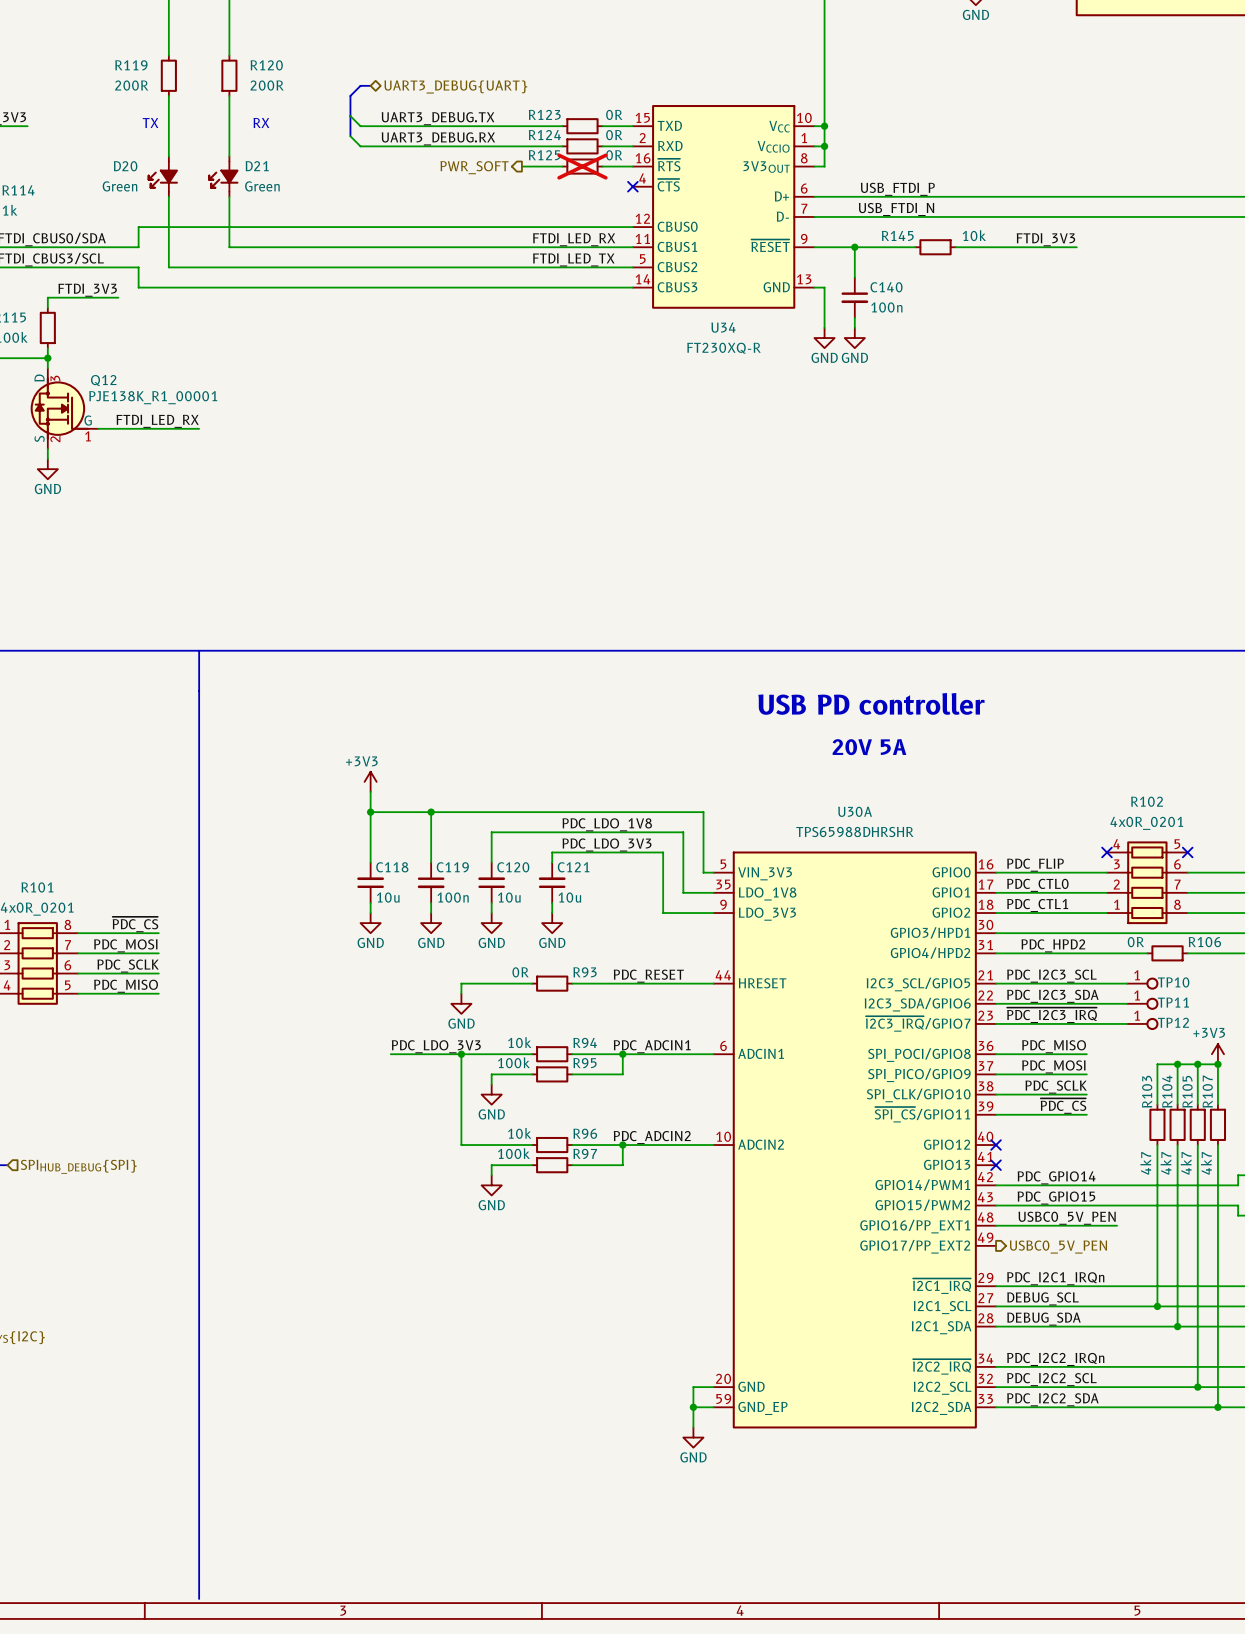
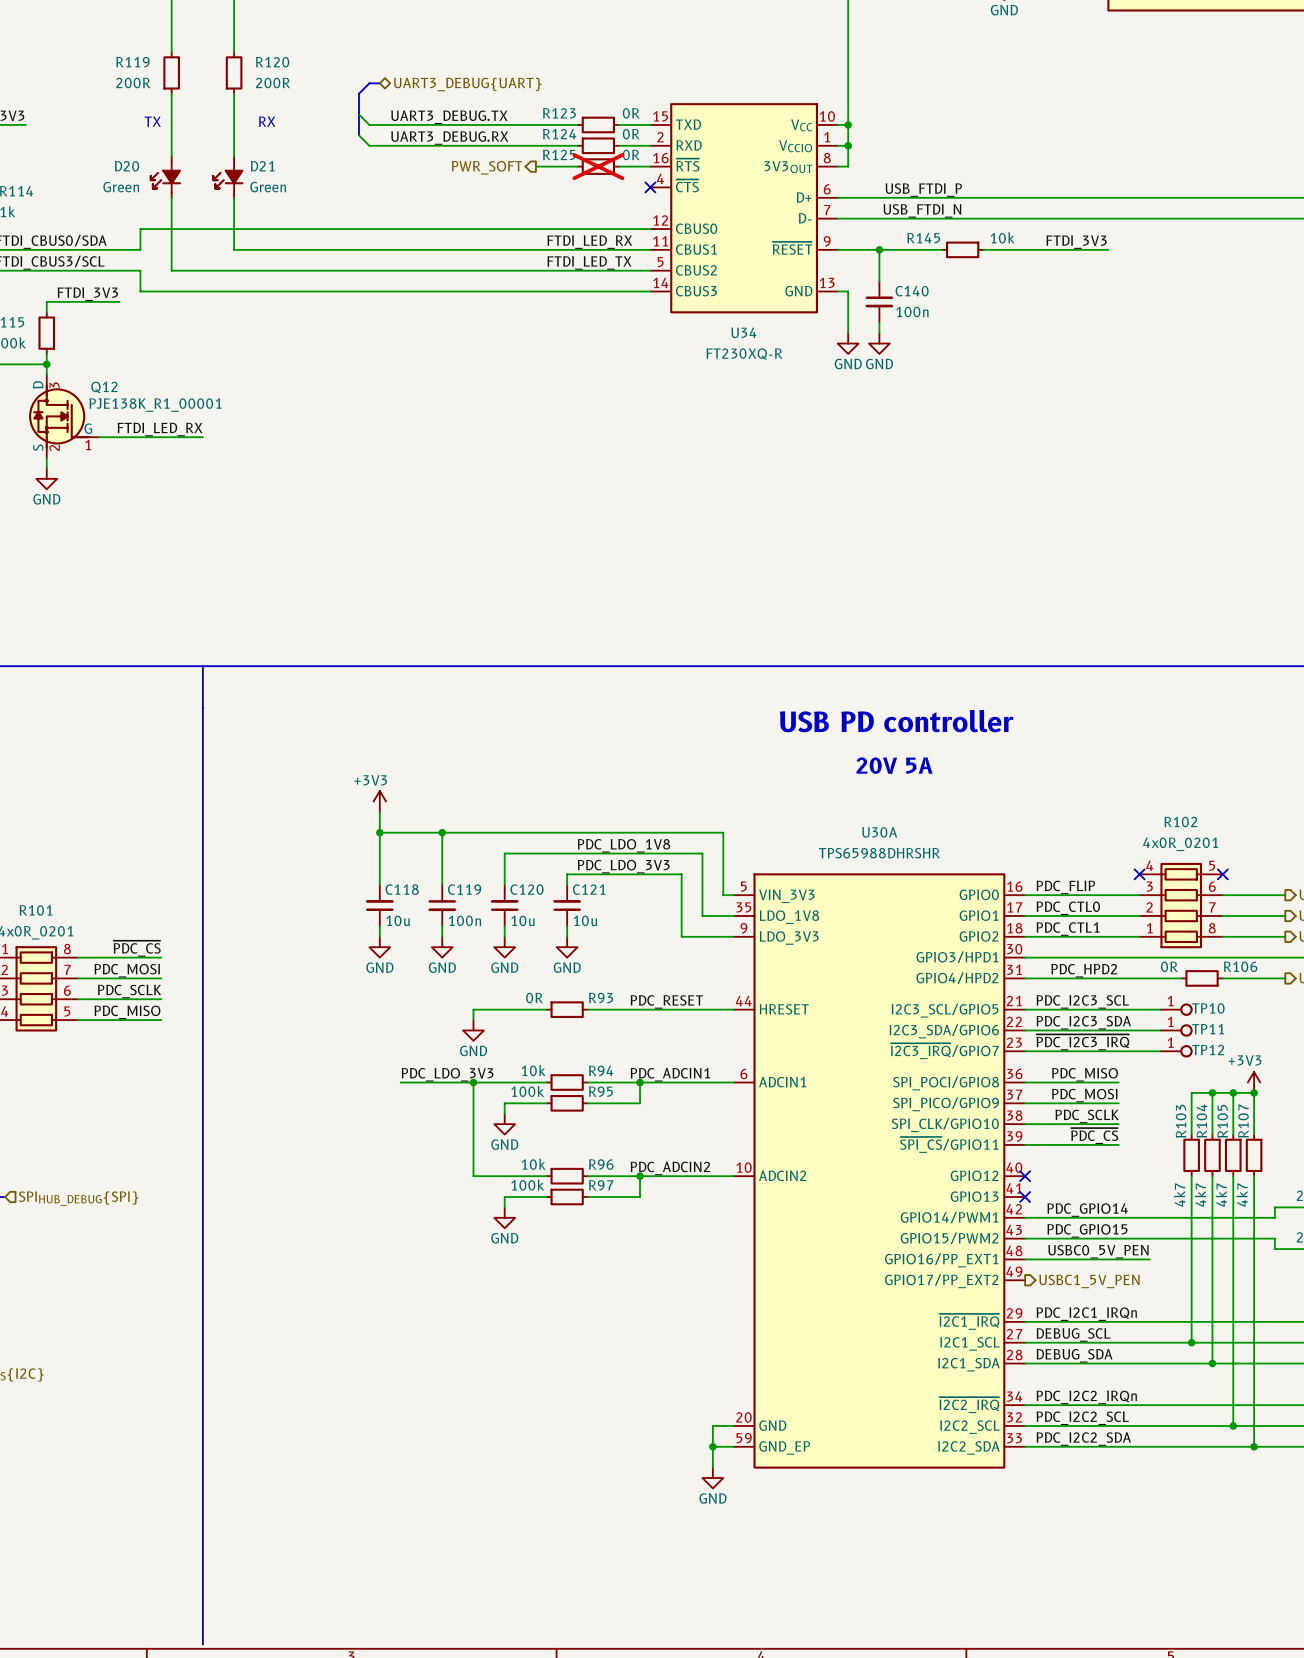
hierarchical label: USBC0_5V_PEN (1058, 1247) -> USBC1_5V_PEN (1089, 1281)

